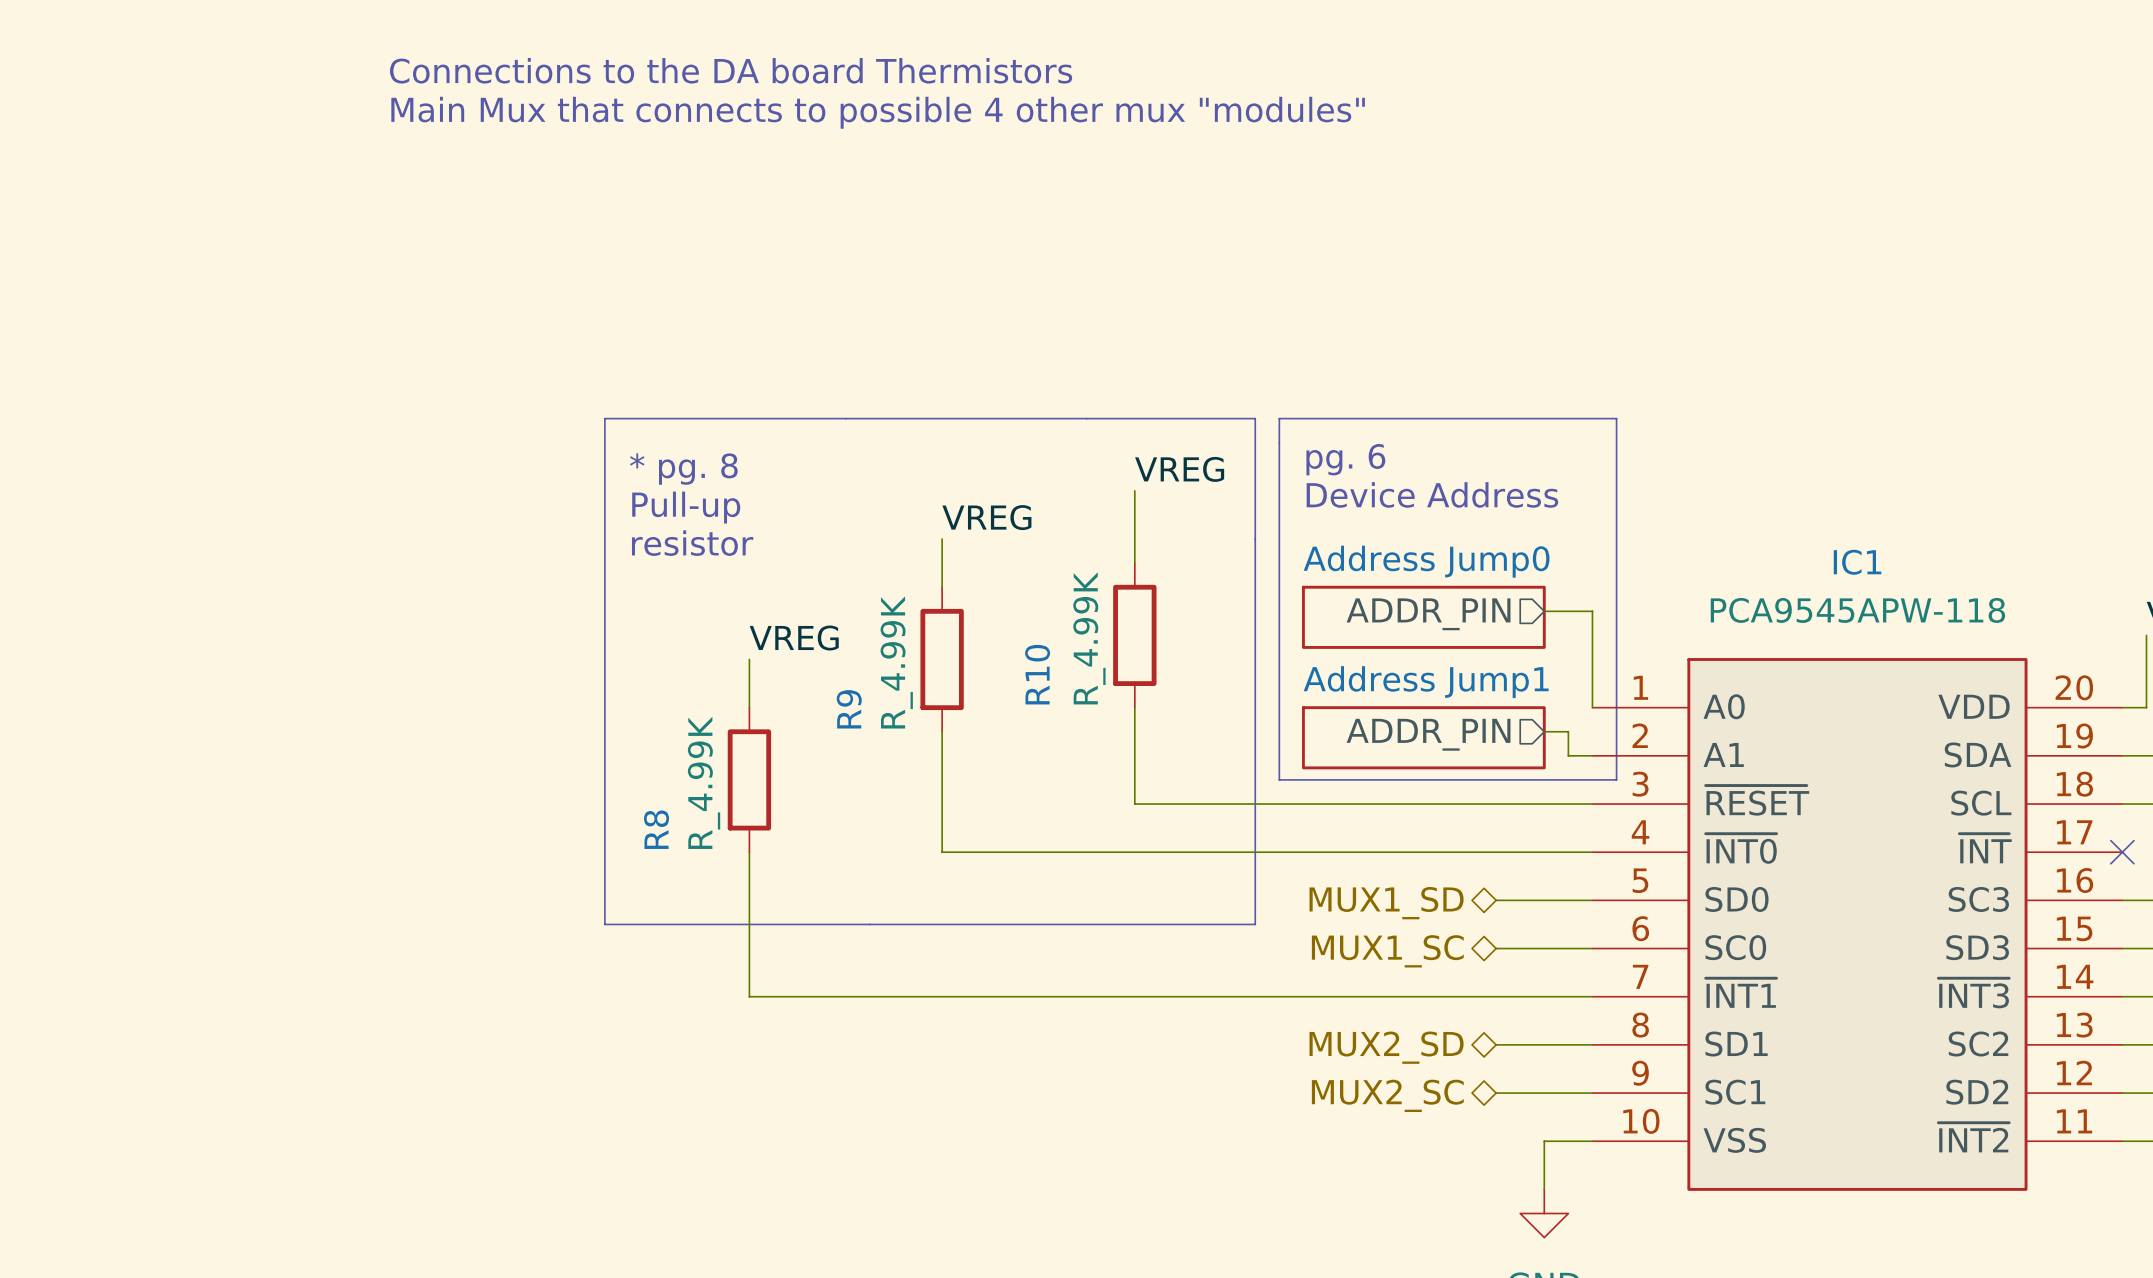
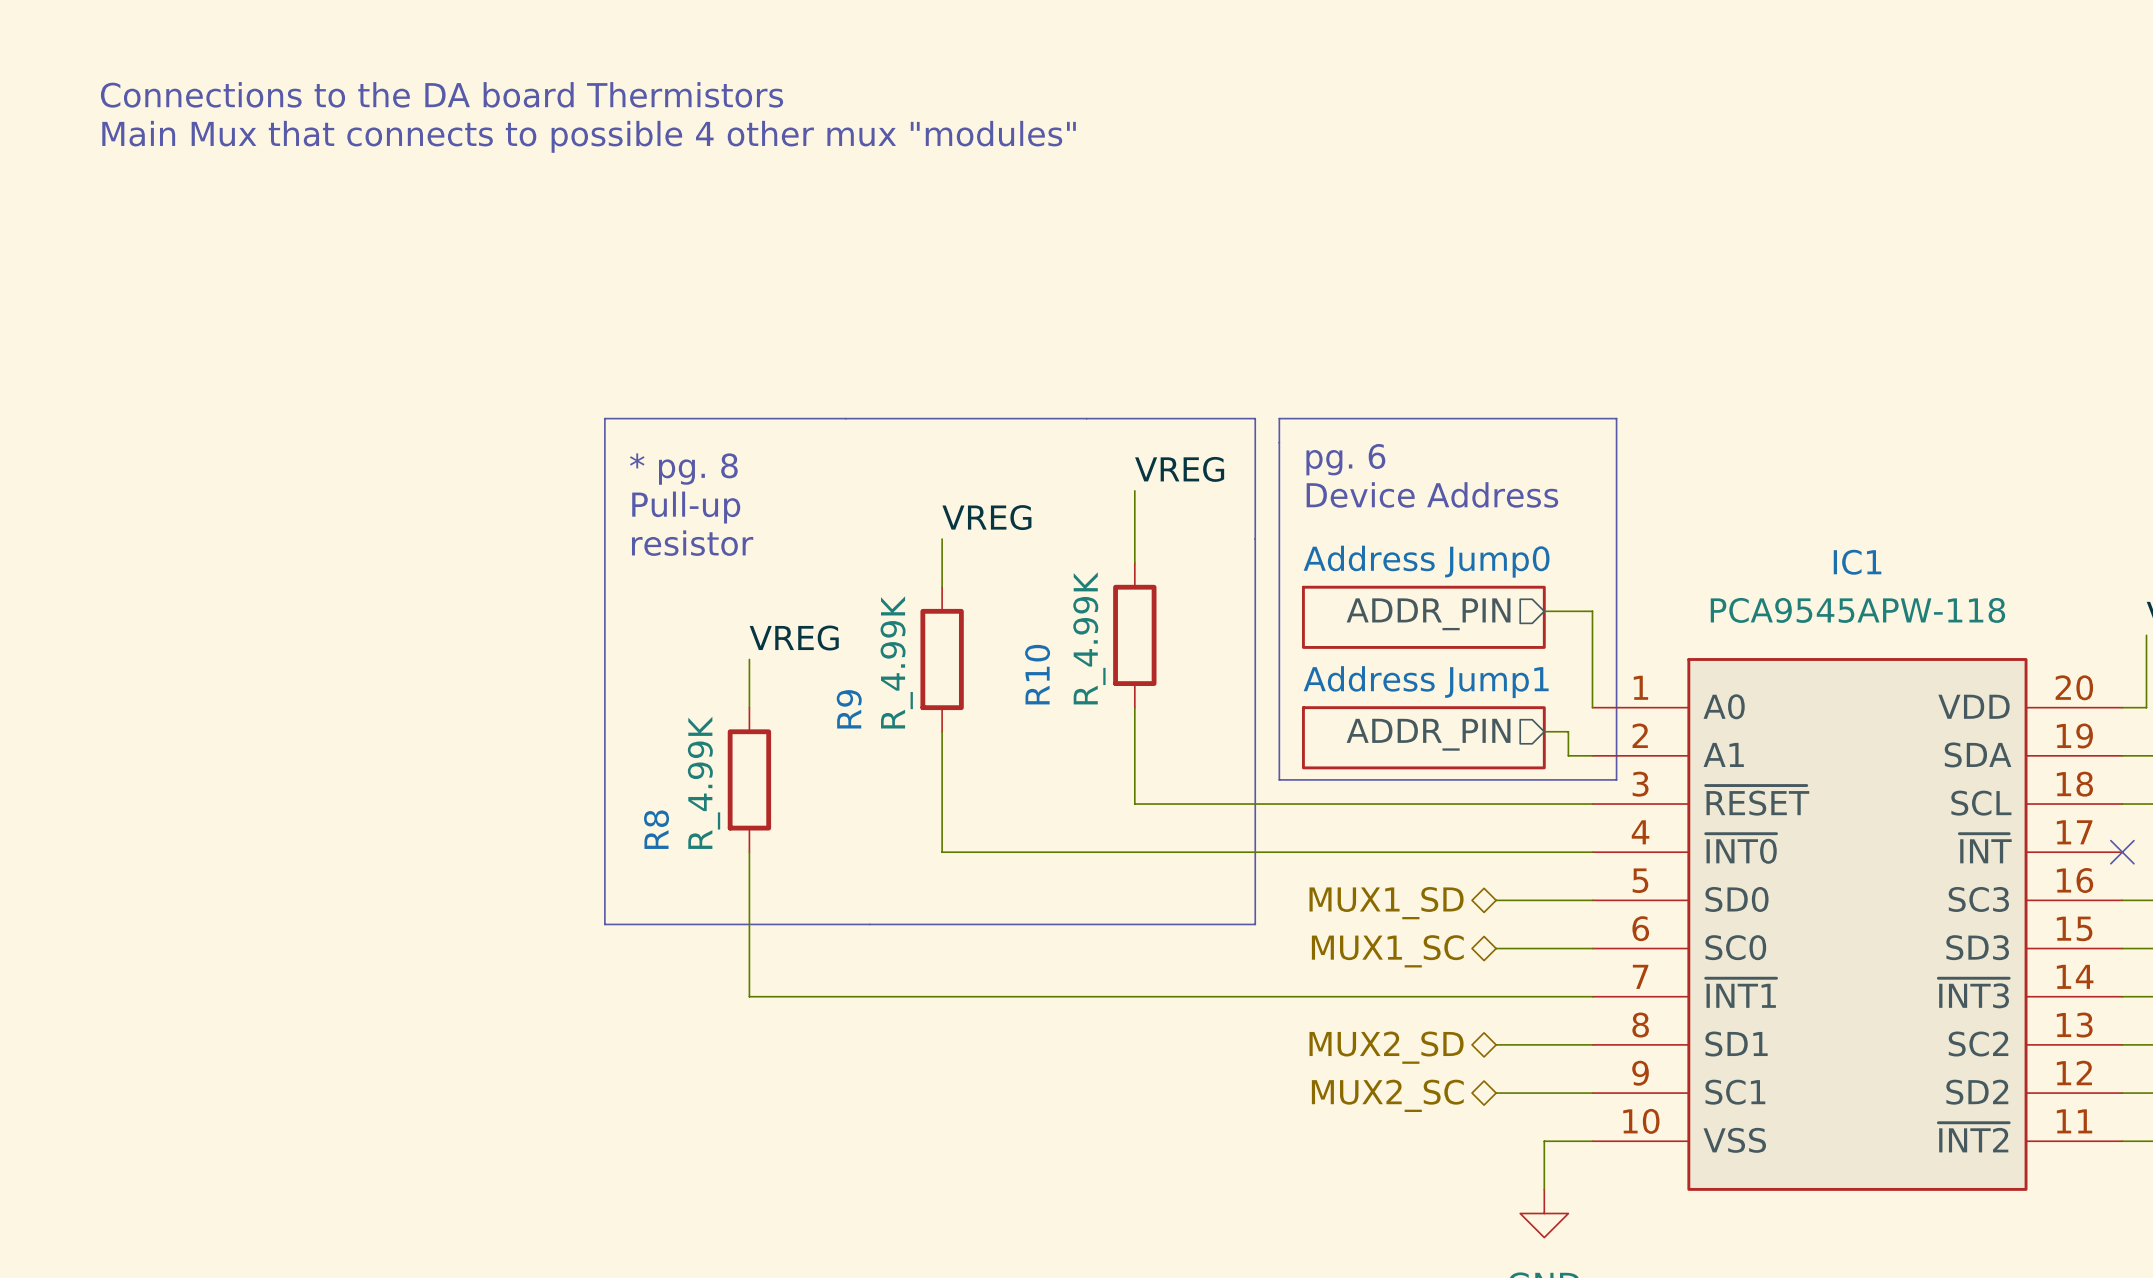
text position: Connections to the DA board Thermistors (731, 70) -> Connections to the DA board Thermistors (442, 94)
text position: Main Mux that connects to possible 4 other mux "modules" (878, 112) -> Main Mux that connects to possible 4 other mux "modules" (589, 136)

